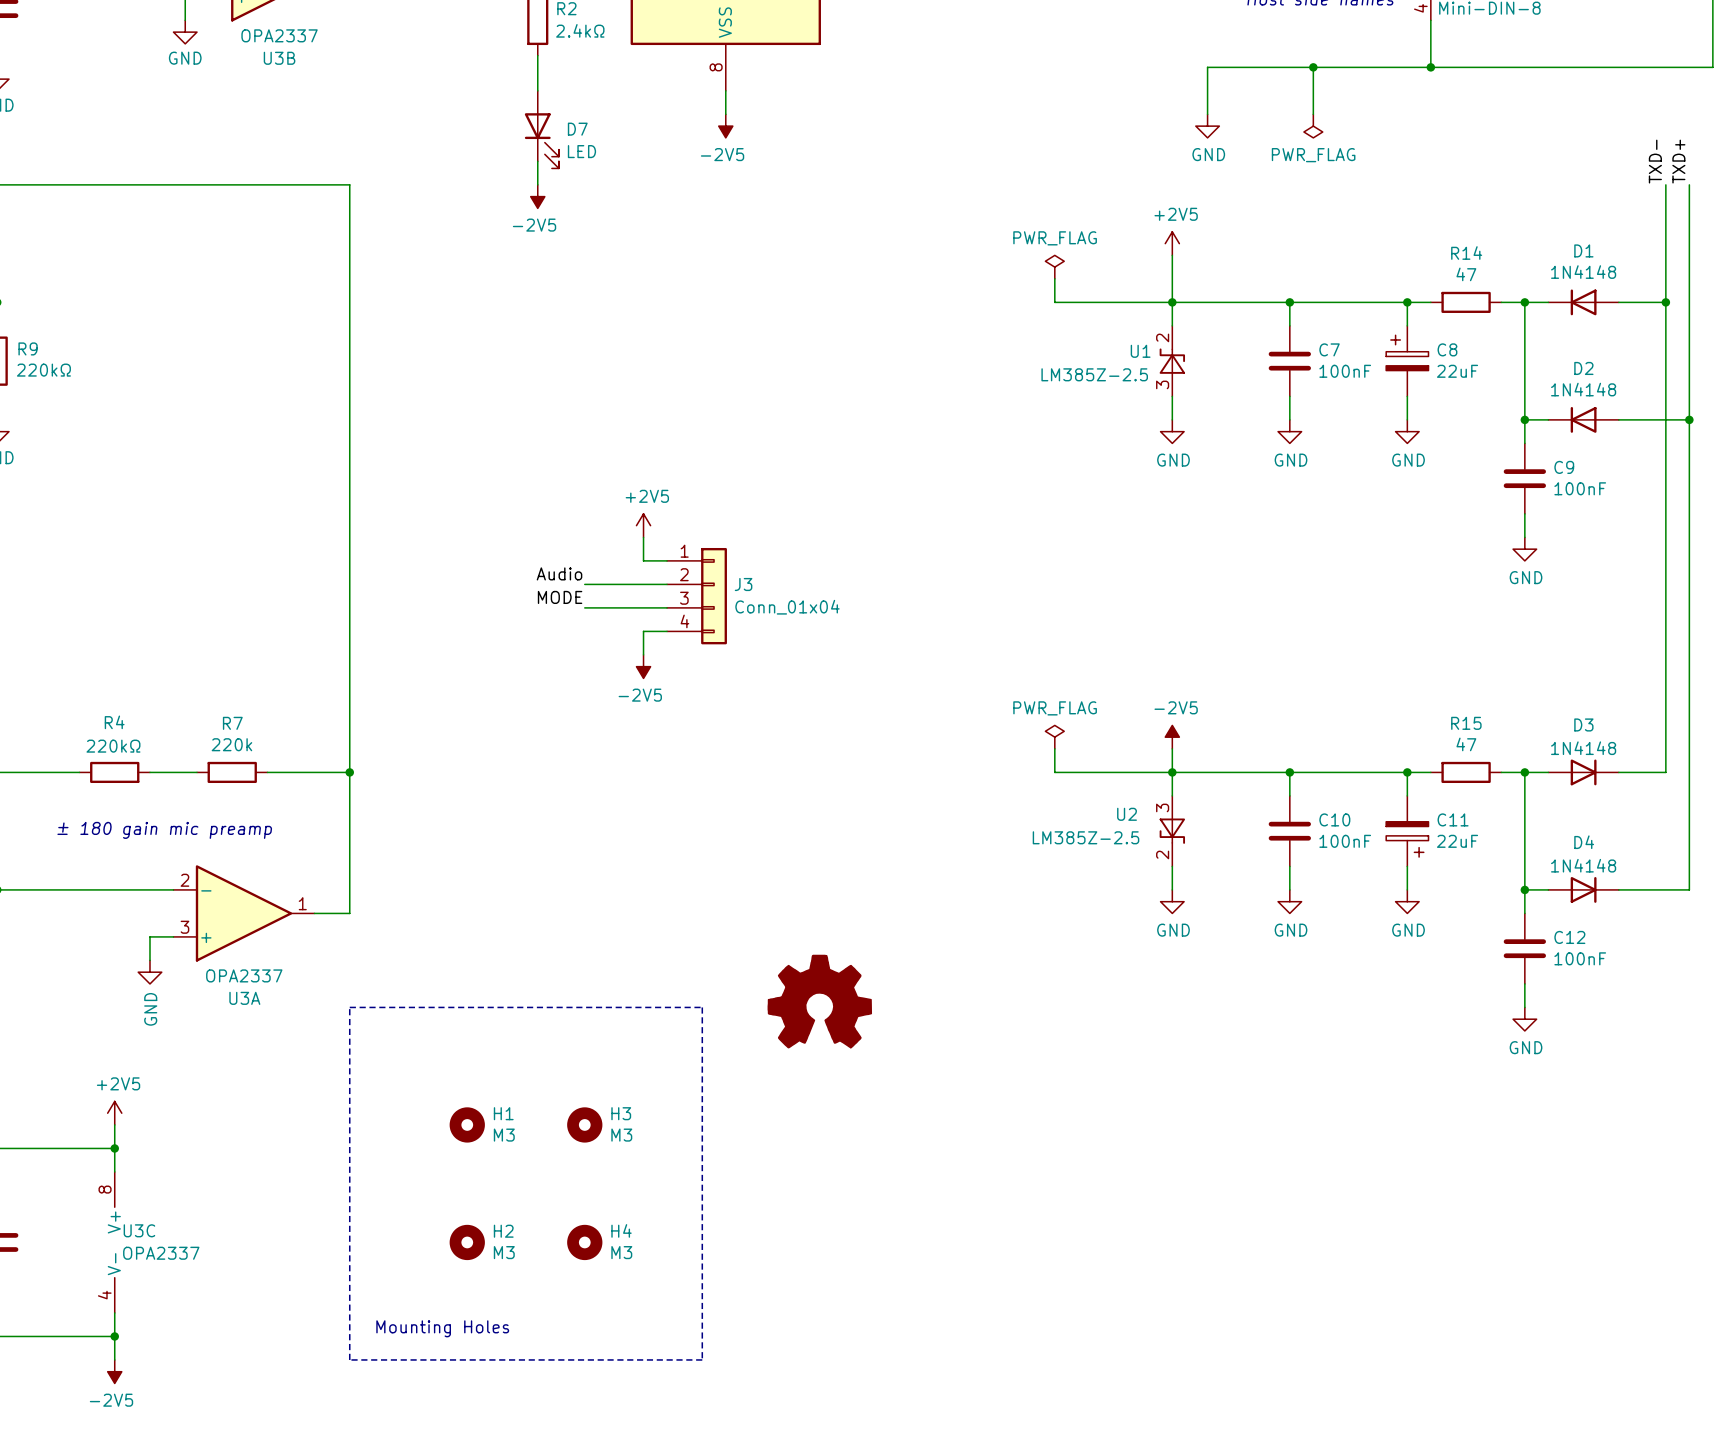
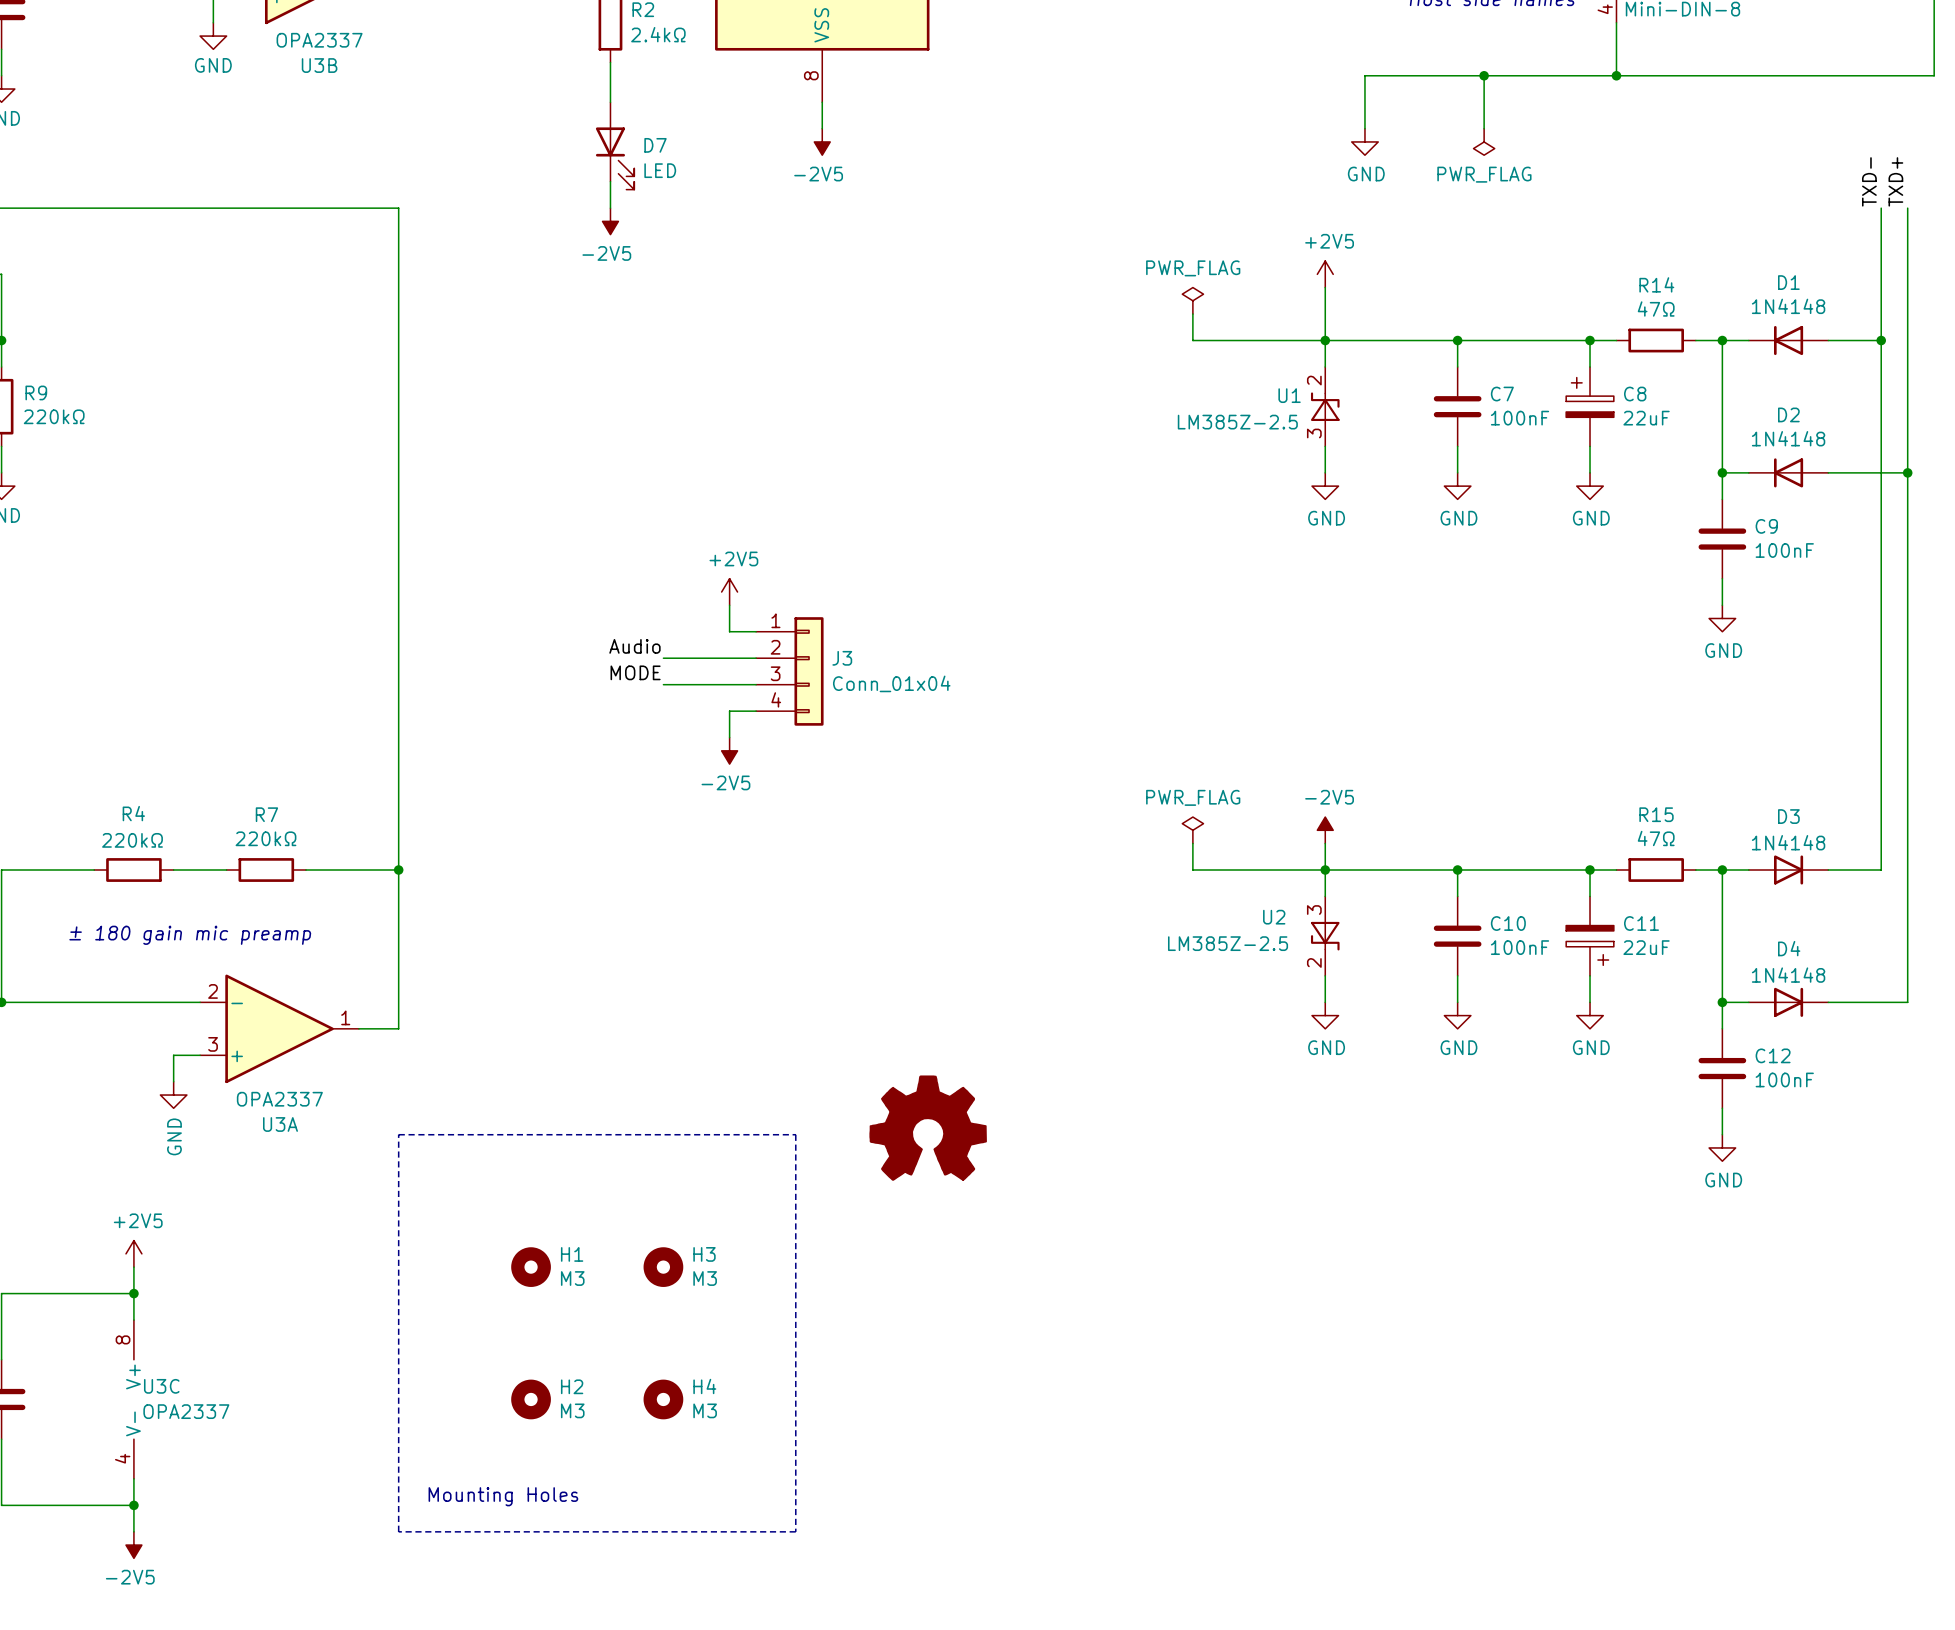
R14 value: 47 (1466, 274) -> 47Ω (1656, 309)
R7 value: 220k (231, 744) -> 220kΩ (265, 838)
R15 value: 47 (1466, 744) -> 47Ω (1656, 838)

